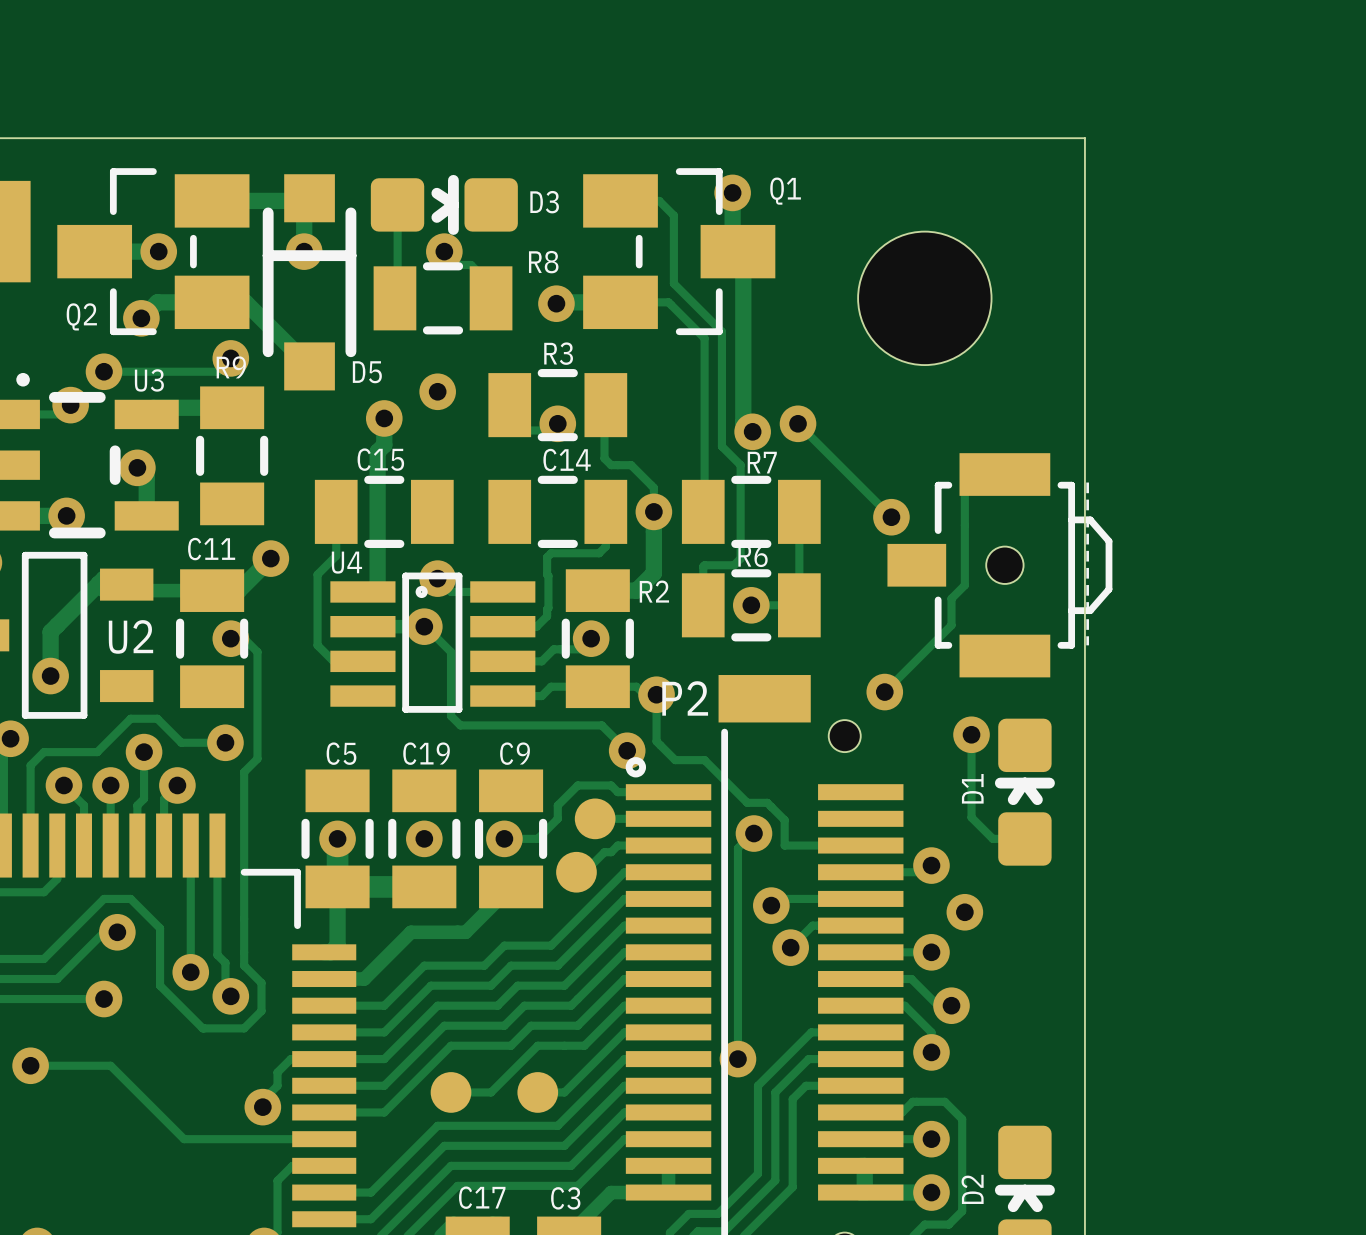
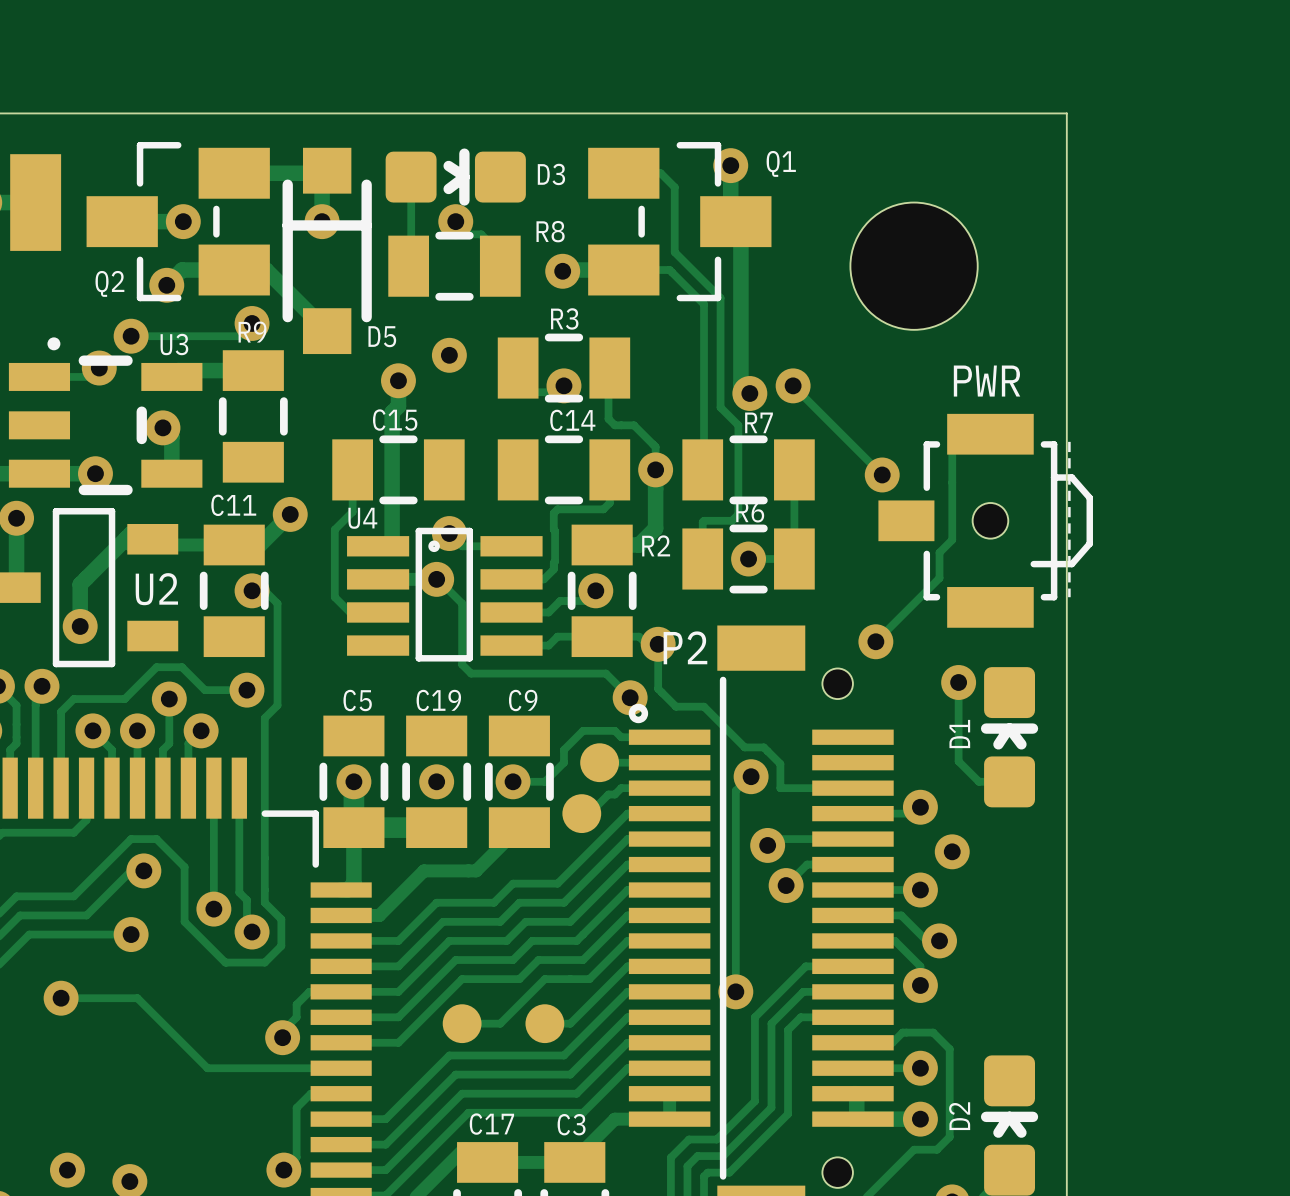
part: (999, 565) -> none
PWR: none -> (985, 520)

